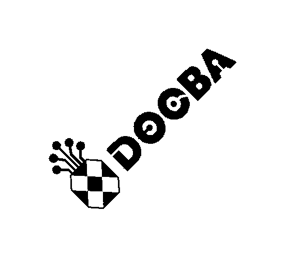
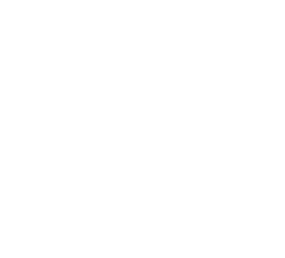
drawing: [48, 48, 237, 210] -> none

